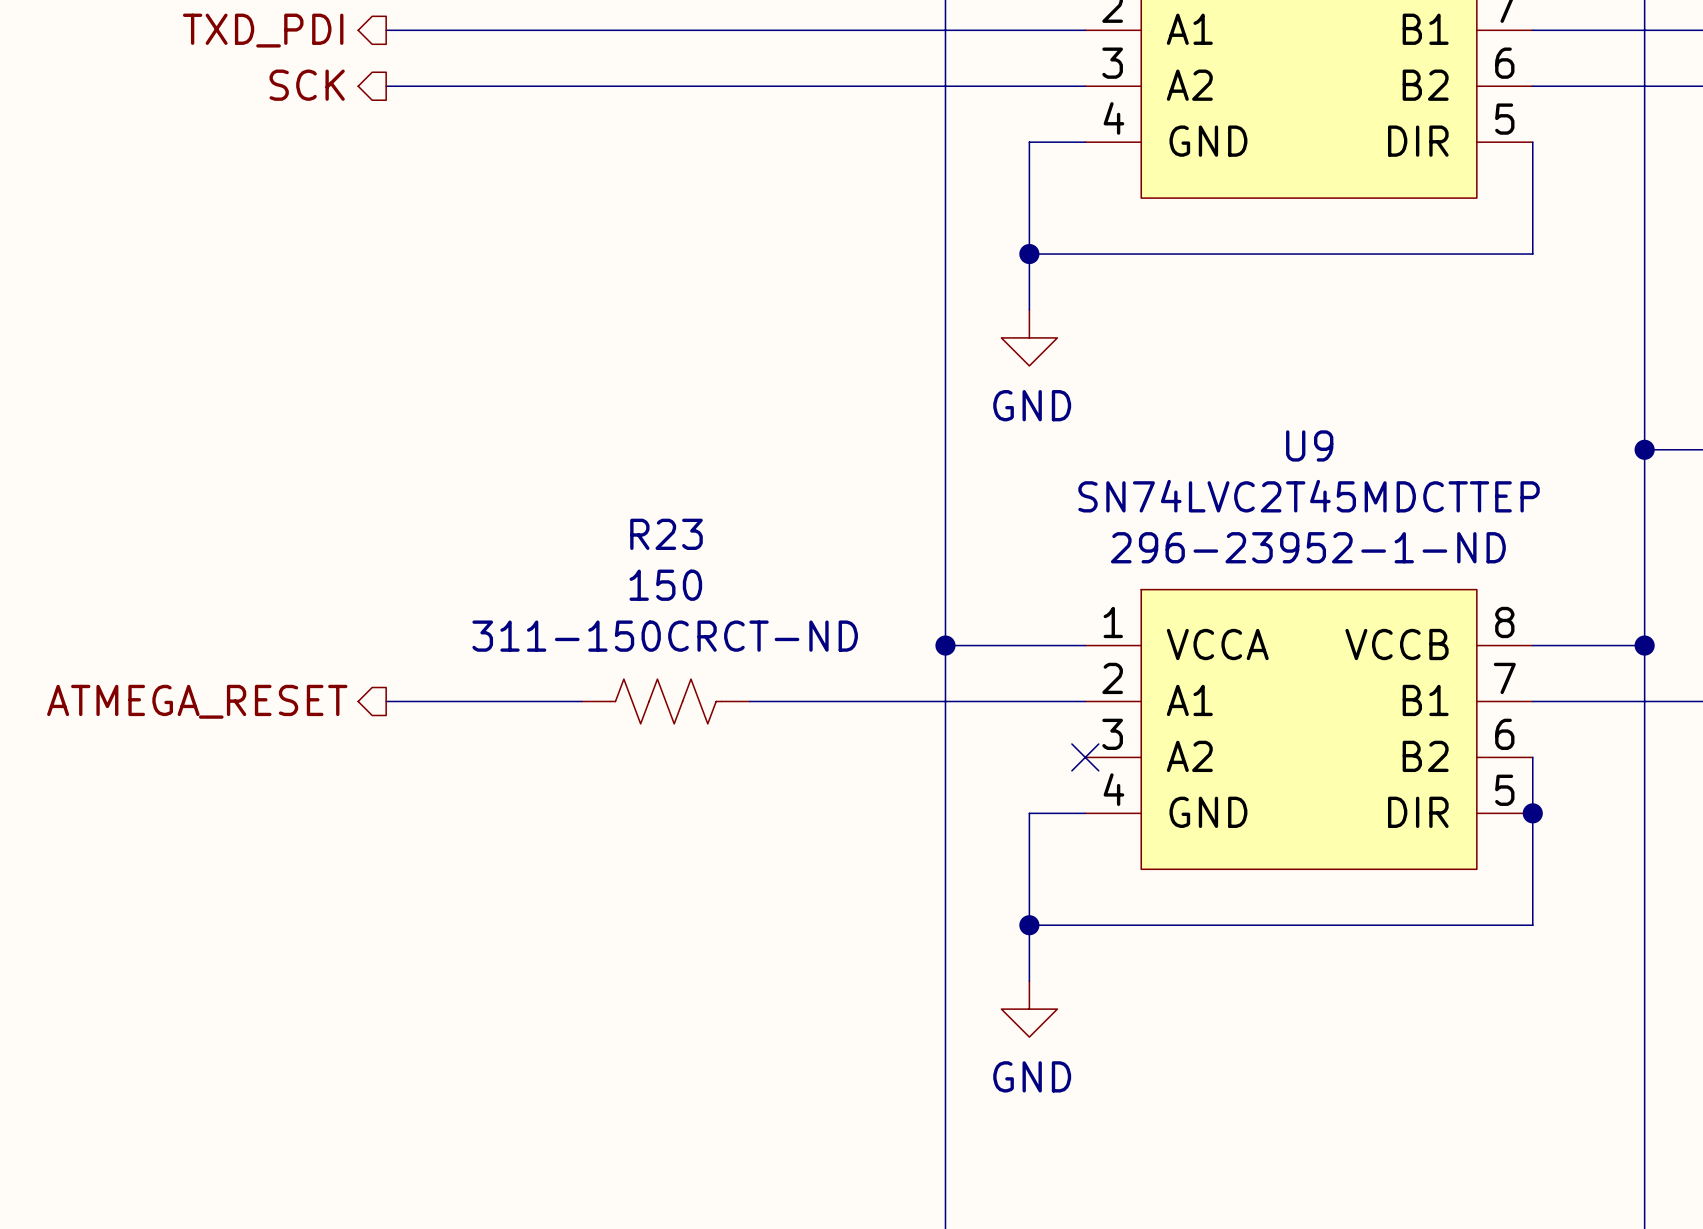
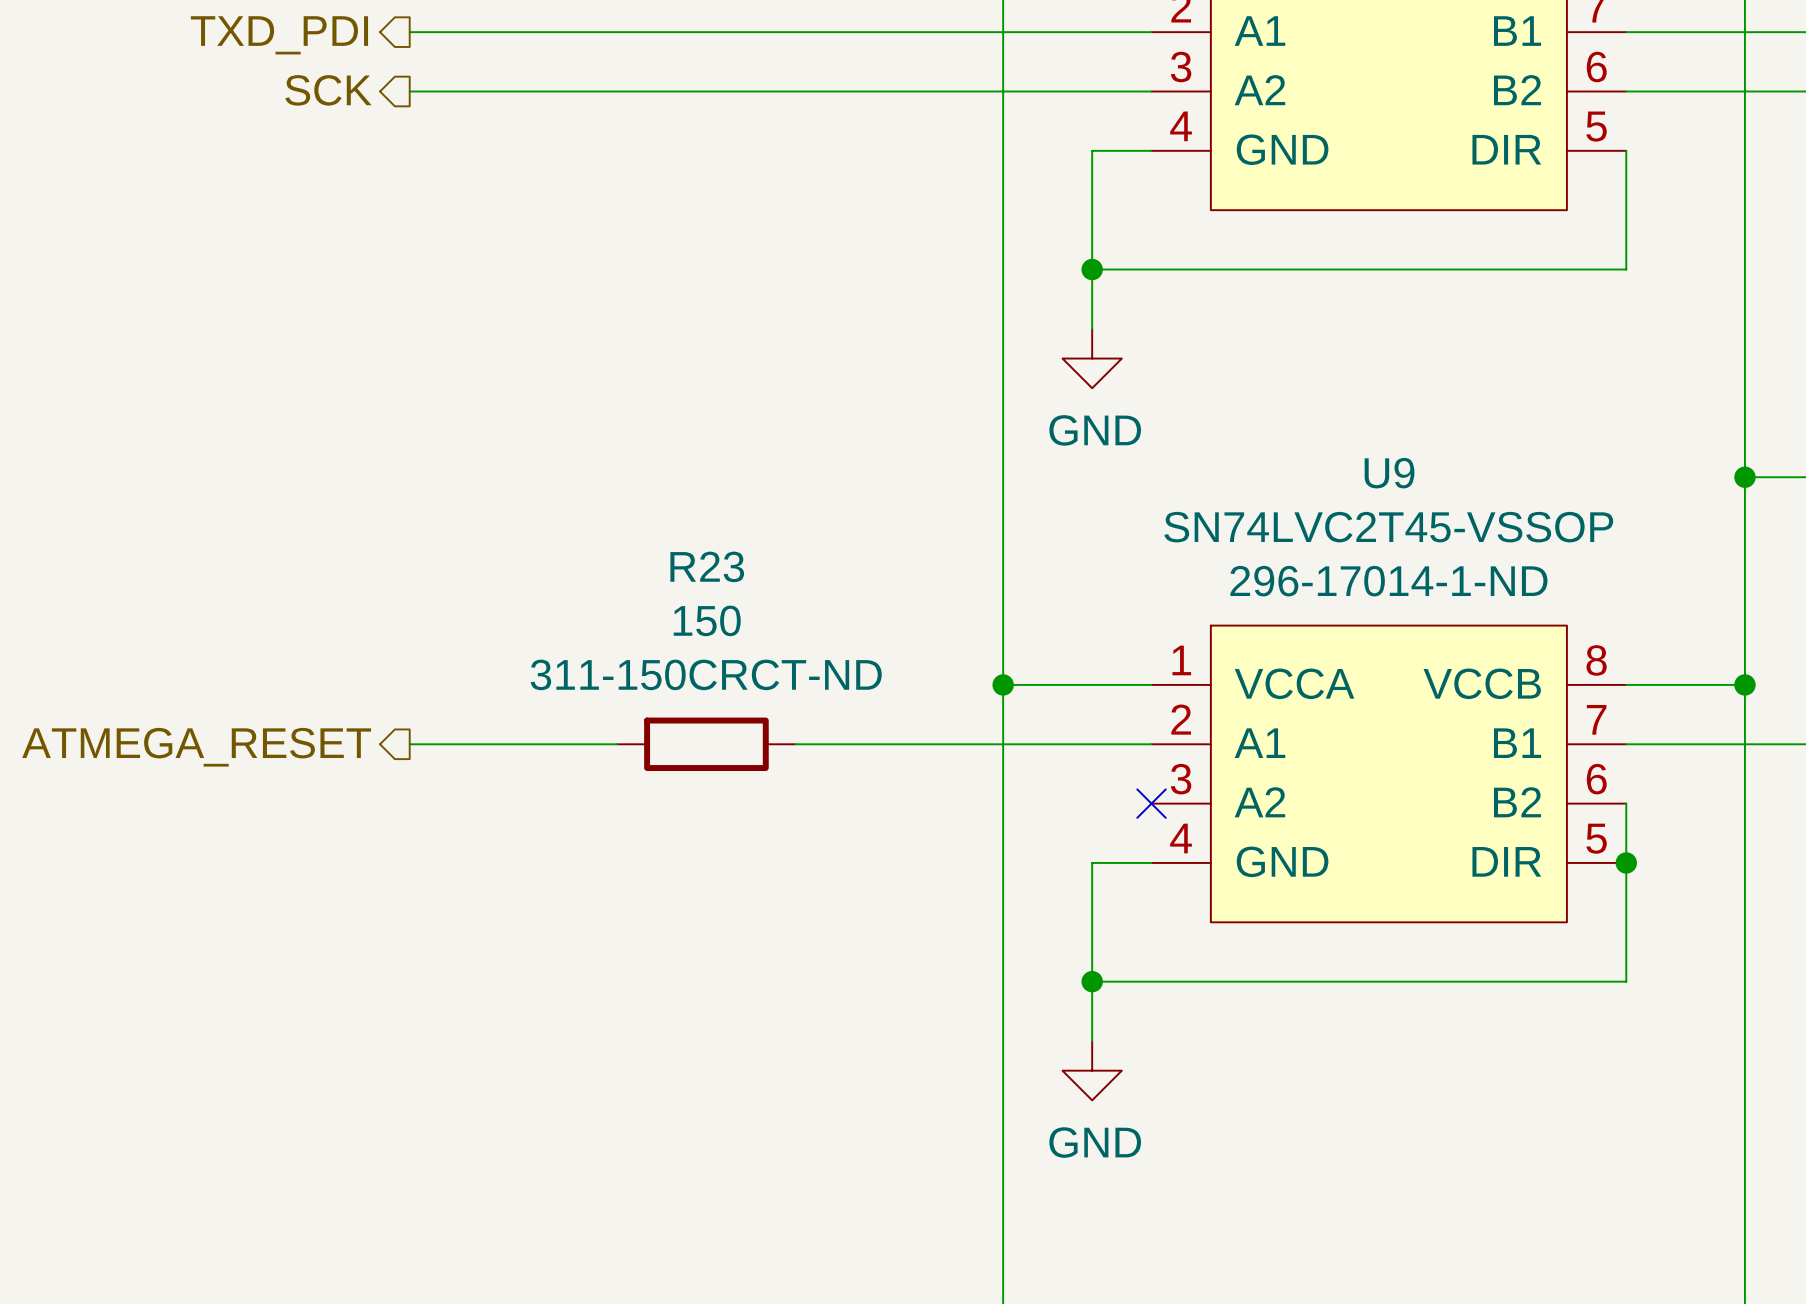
U9 value: SN74LVC2T45MDCTTEP (1309, 496) -> SN74LVC2T45-VSSOP (1388, 527)
U9 text: 296-23952-1-ND (1308, 547) -> 296-17014-1-ND (1388, 581)
R23 symbol: [581, 679, 750, 724] -> [617, 717, 796, 771]

